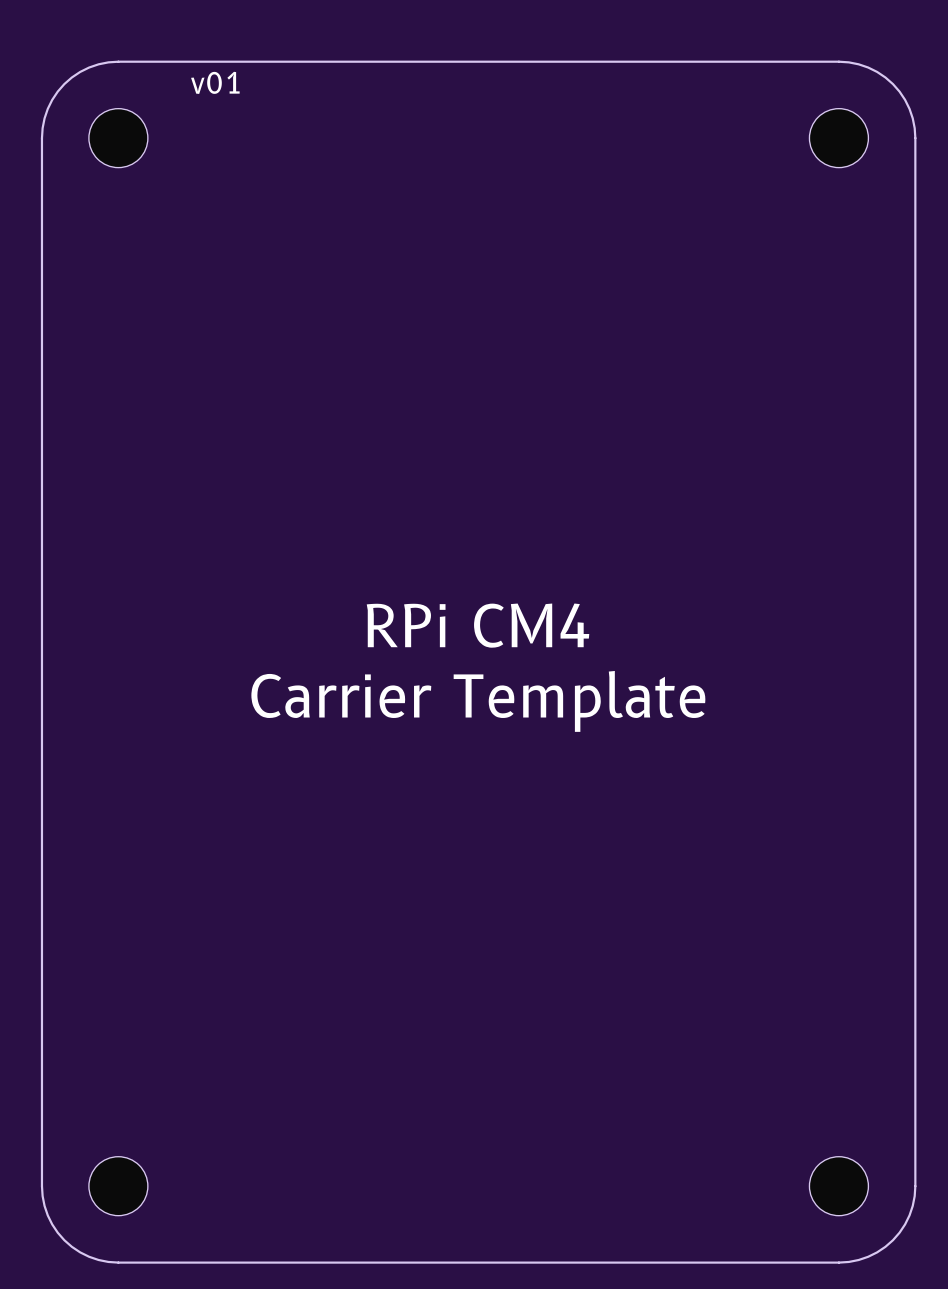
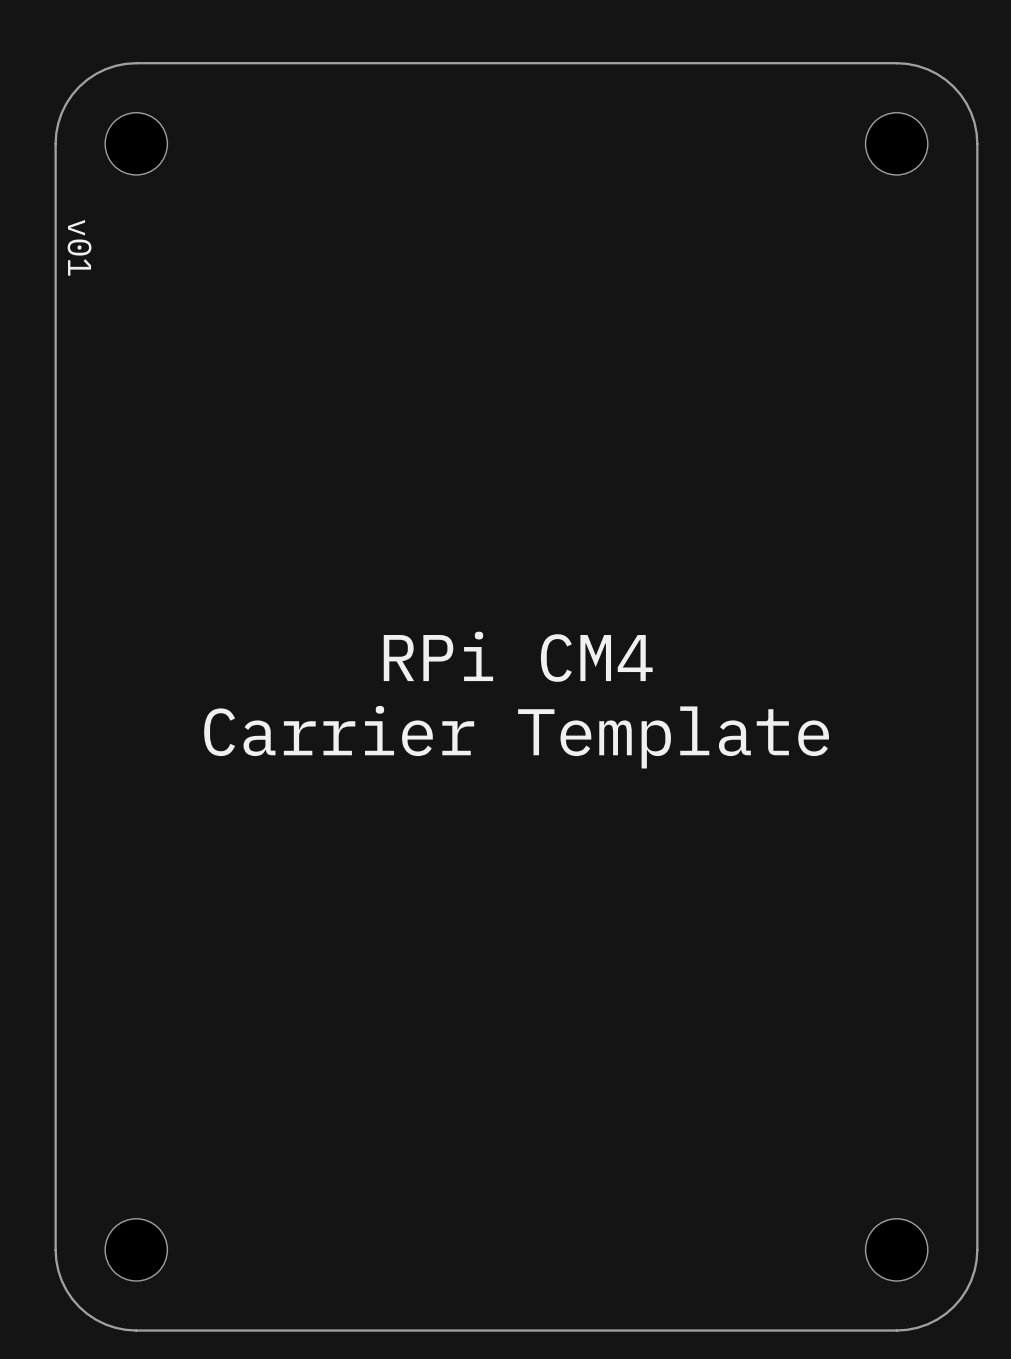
text rotation: 0° (215, 82) -> 90° clockwise (79, 247)
text position: v01 (215, 82) -> v01 (79, 247)

